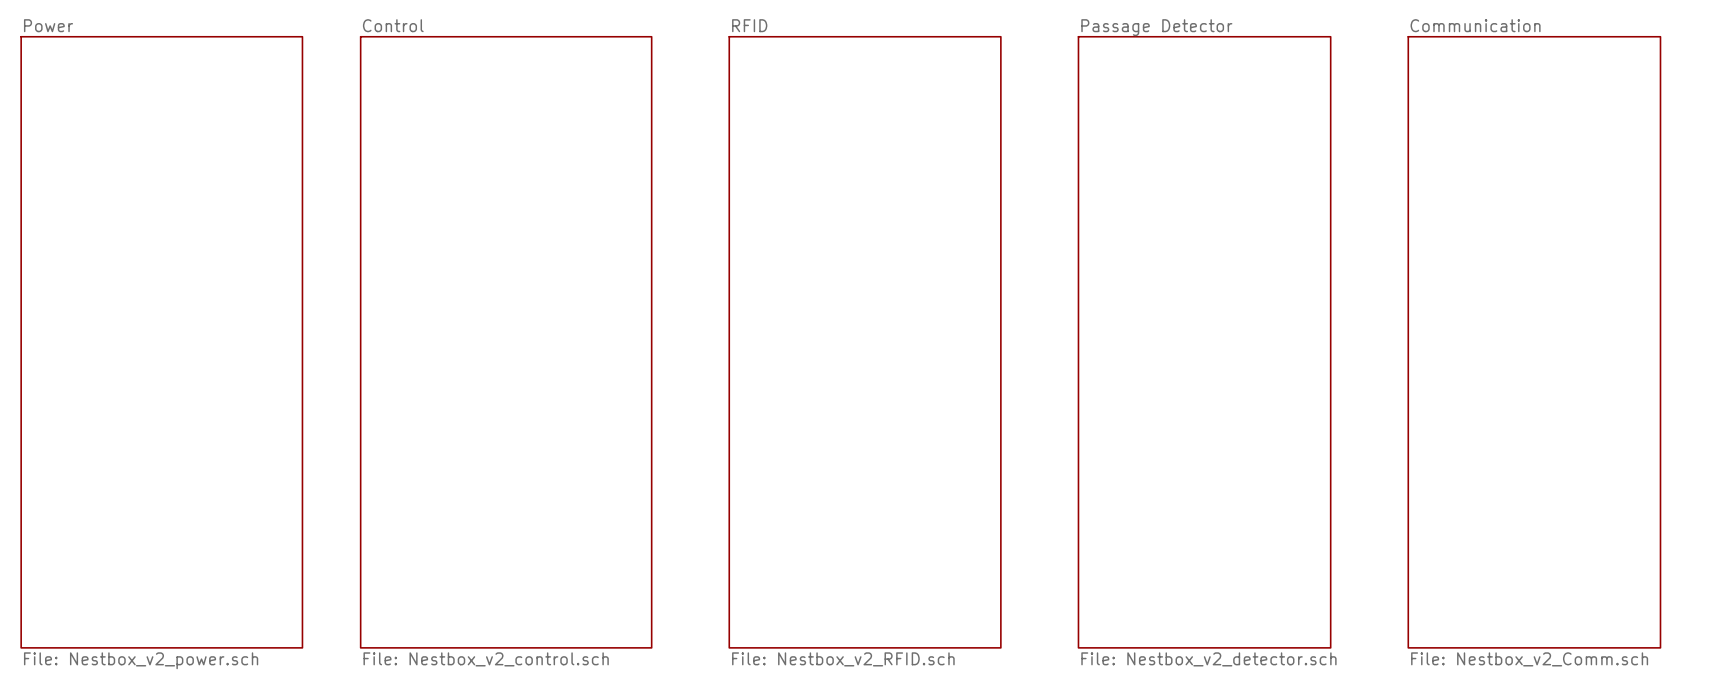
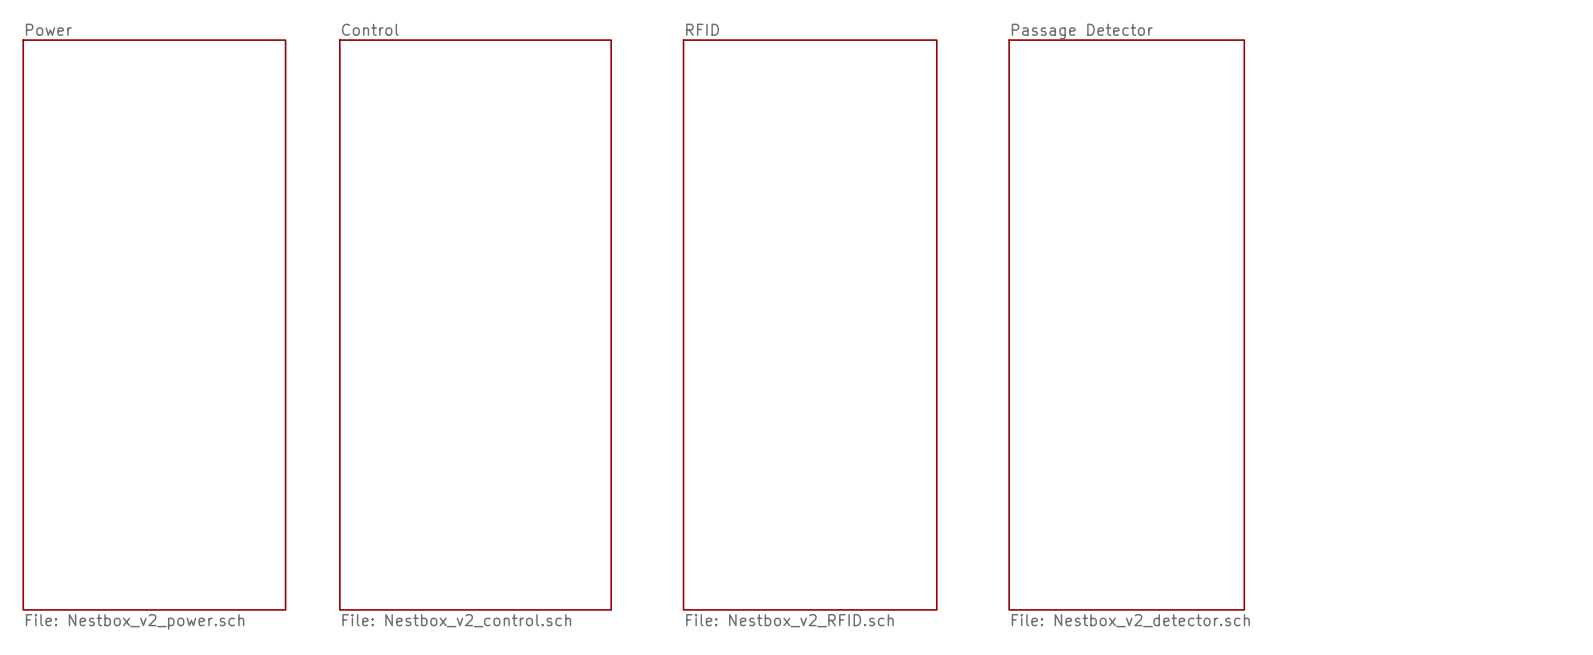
sheet Communication: File: Nestbox_v2_Comm.sch (1534, 342) -> none

